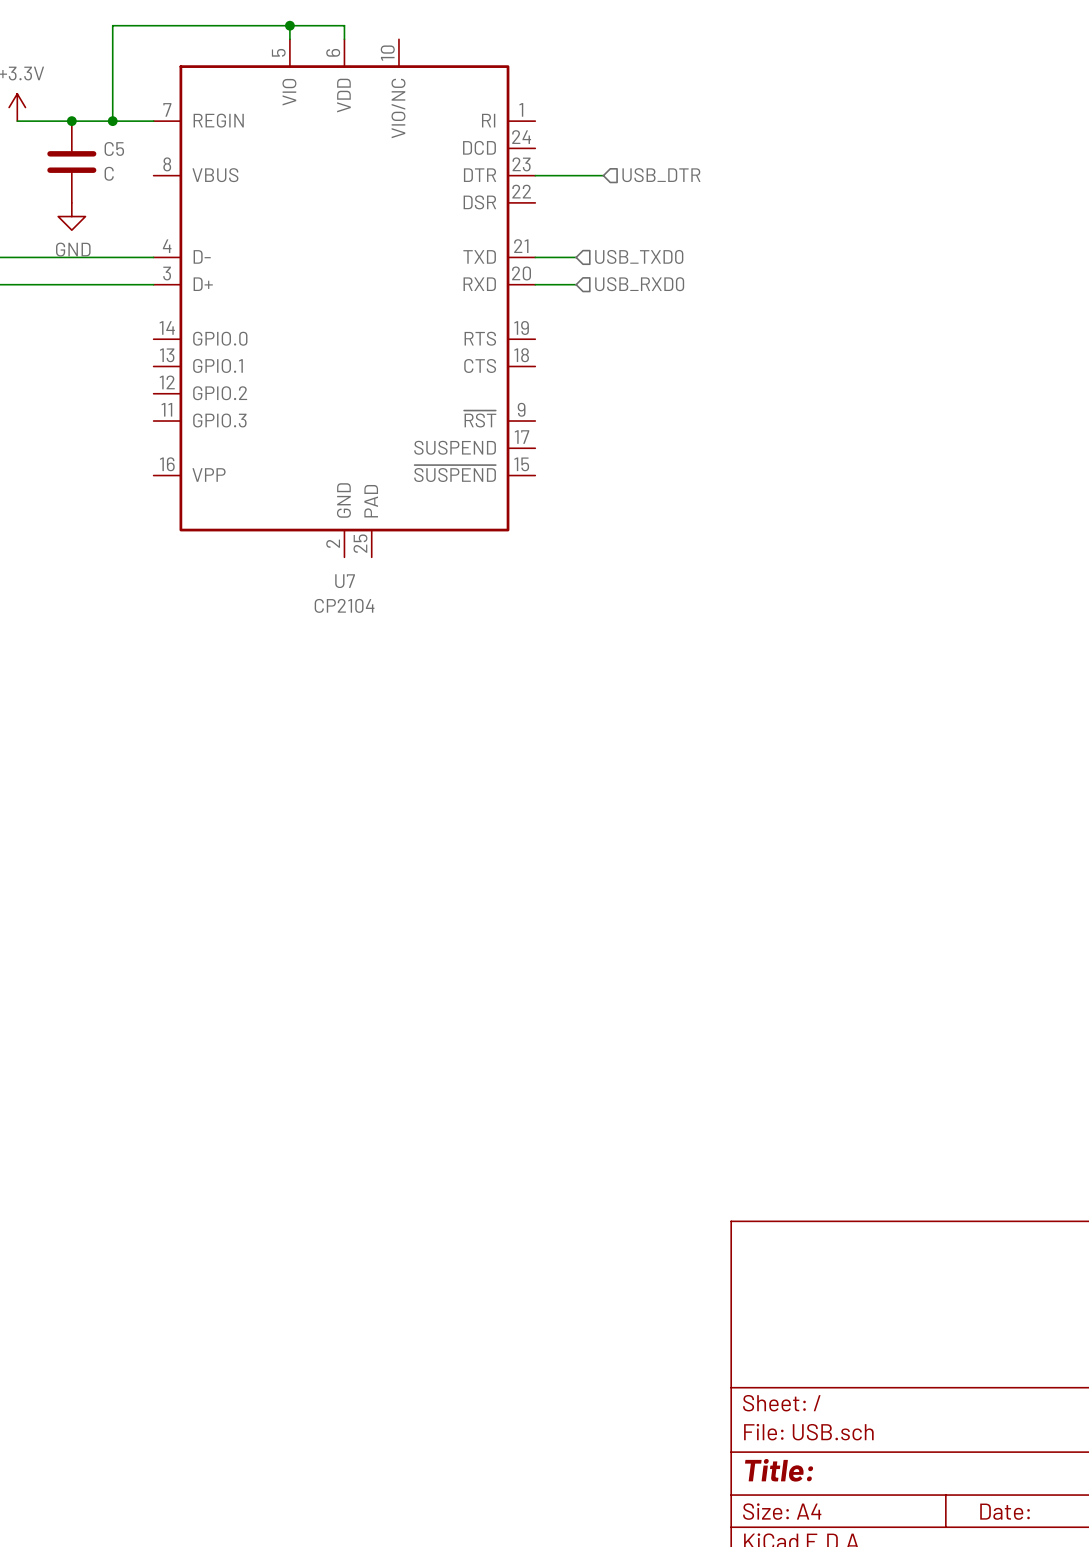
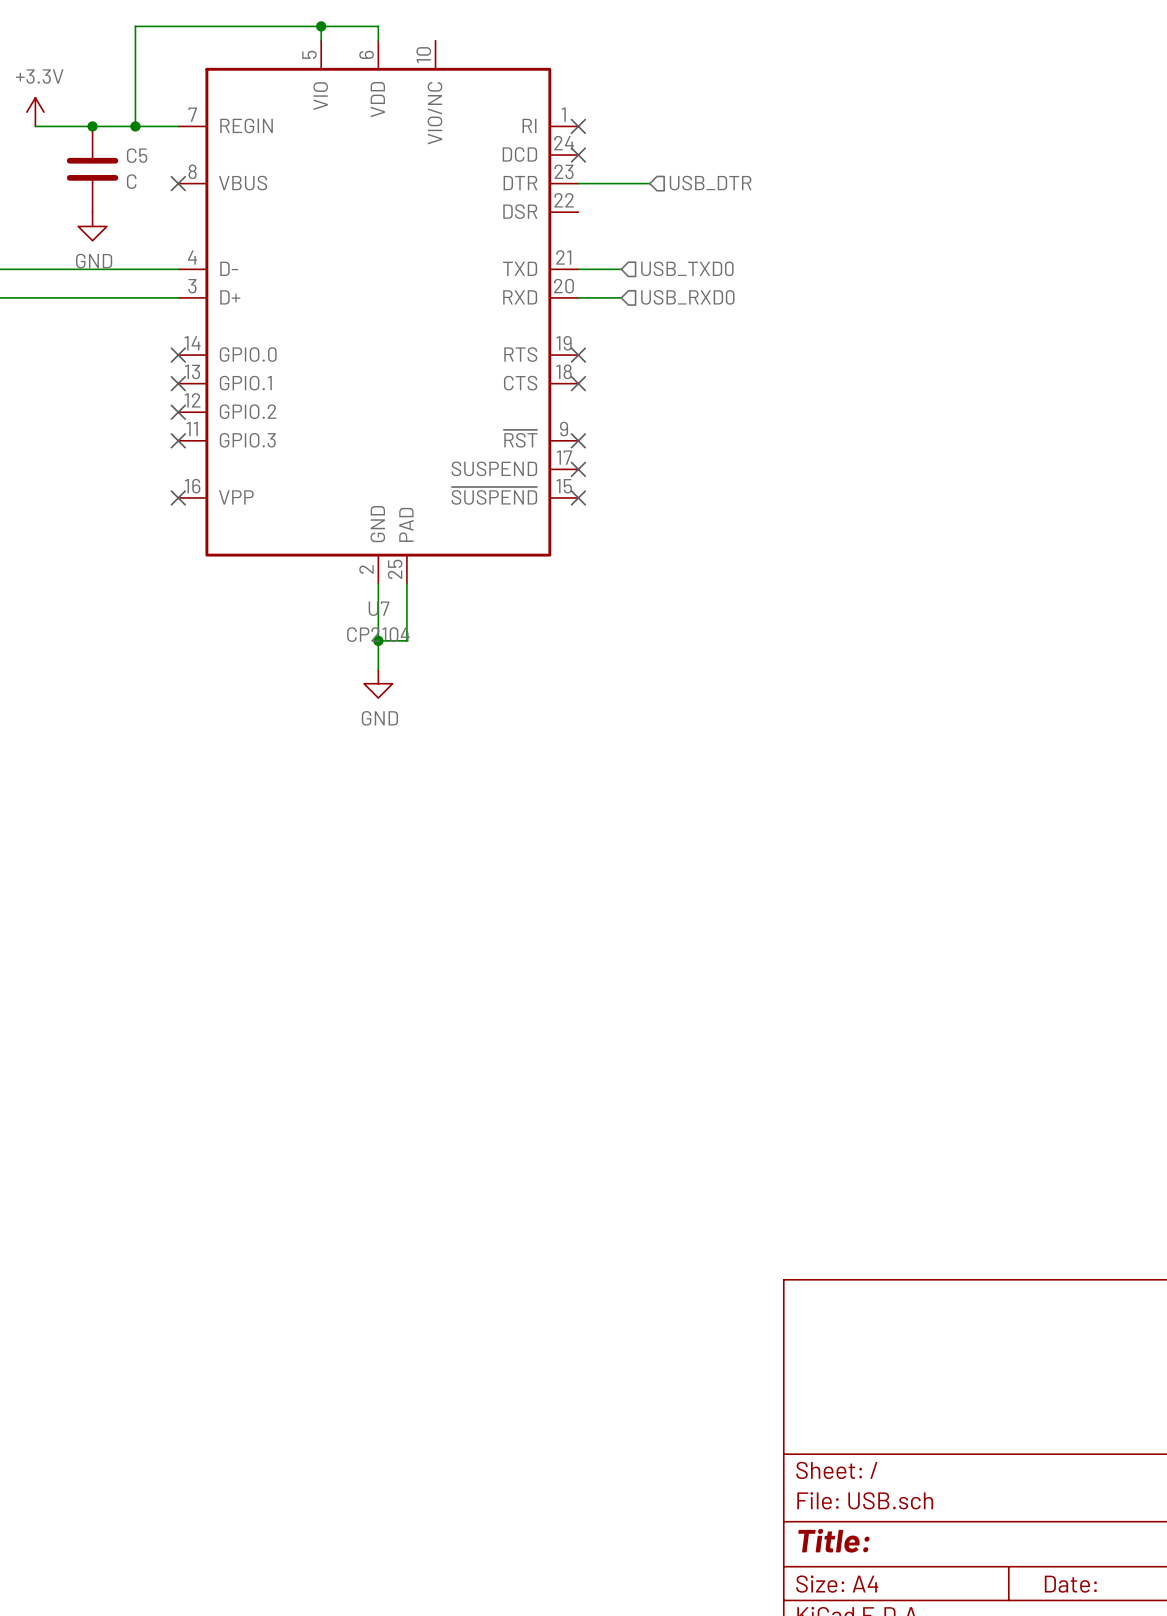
no-connect mark: none -> (578, 126)
no-connect mark: none -> (578, 155)
no-connect mark: none -> (178, 183)
no-connect mark: none -> (178, 355)
no-connect mark: none -> (578, 355)
no-connect mark: none -> (178, 383)
no-connect mark: none -> (578, 383)
no-connect mark: none -> (178, 412)
no-connect mark: none -> (178, 440)
no-connect mark: none -> (578, 440)
no-connect mark: none -> (578, 469)
no-connect mark: none -> (178, 497)
no-connect mark: none -> (578, 497)
wire: none -> (378, 583) (378, 669)
wire: none -> (406, 583) (406, 640) (378, 640)
junction: none -> (378, 640)
power symbol: none -> GND (378, 683)

